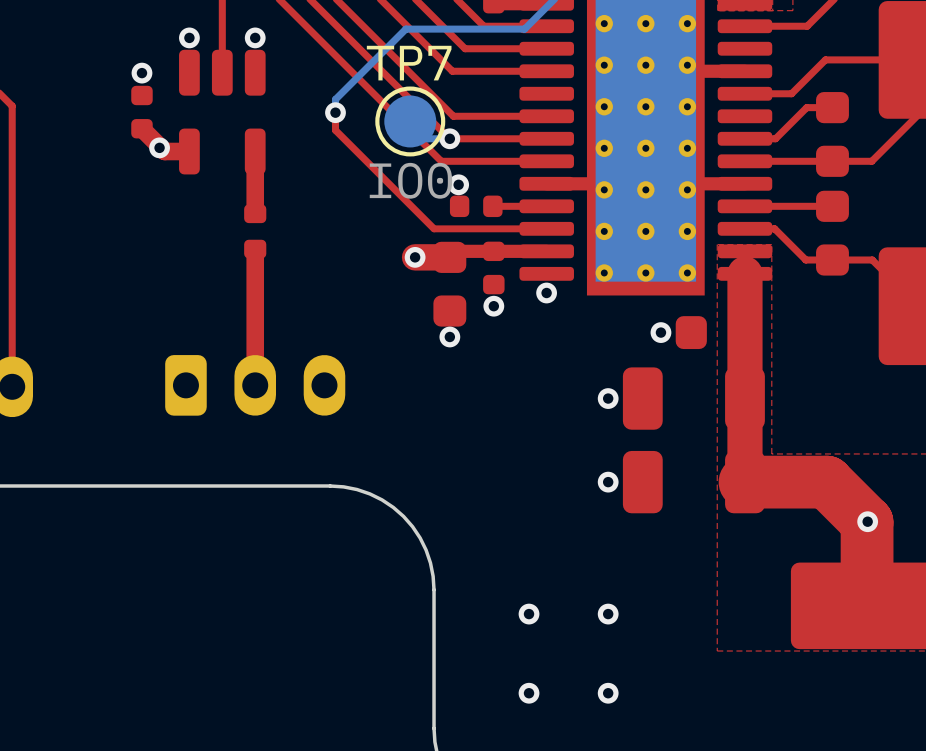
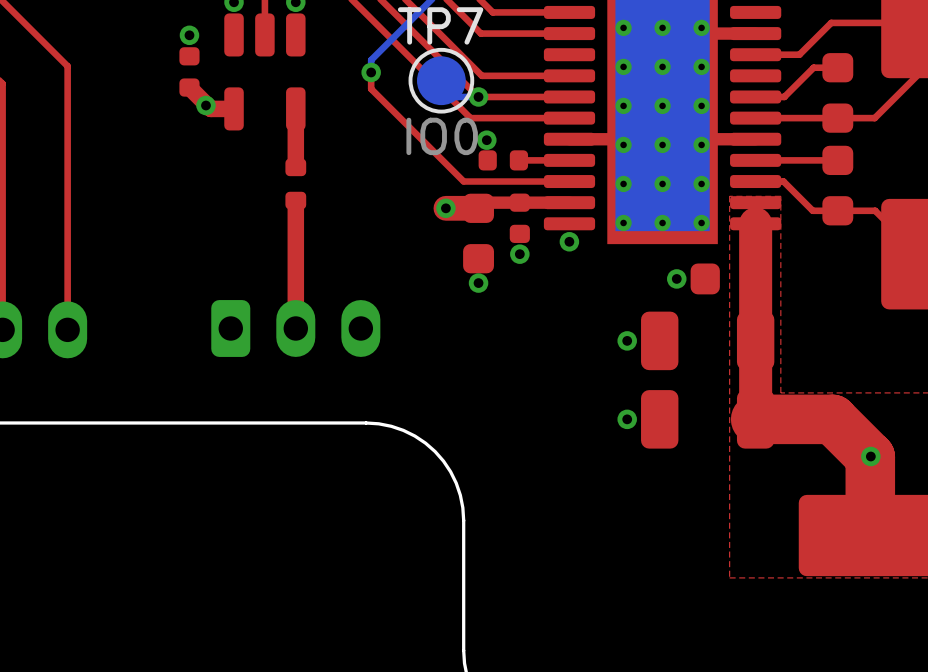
via: (529, 614) -> none
via: (608, 614) -> none
via: (529, 693) -> none
via: (608, 693) -> none

